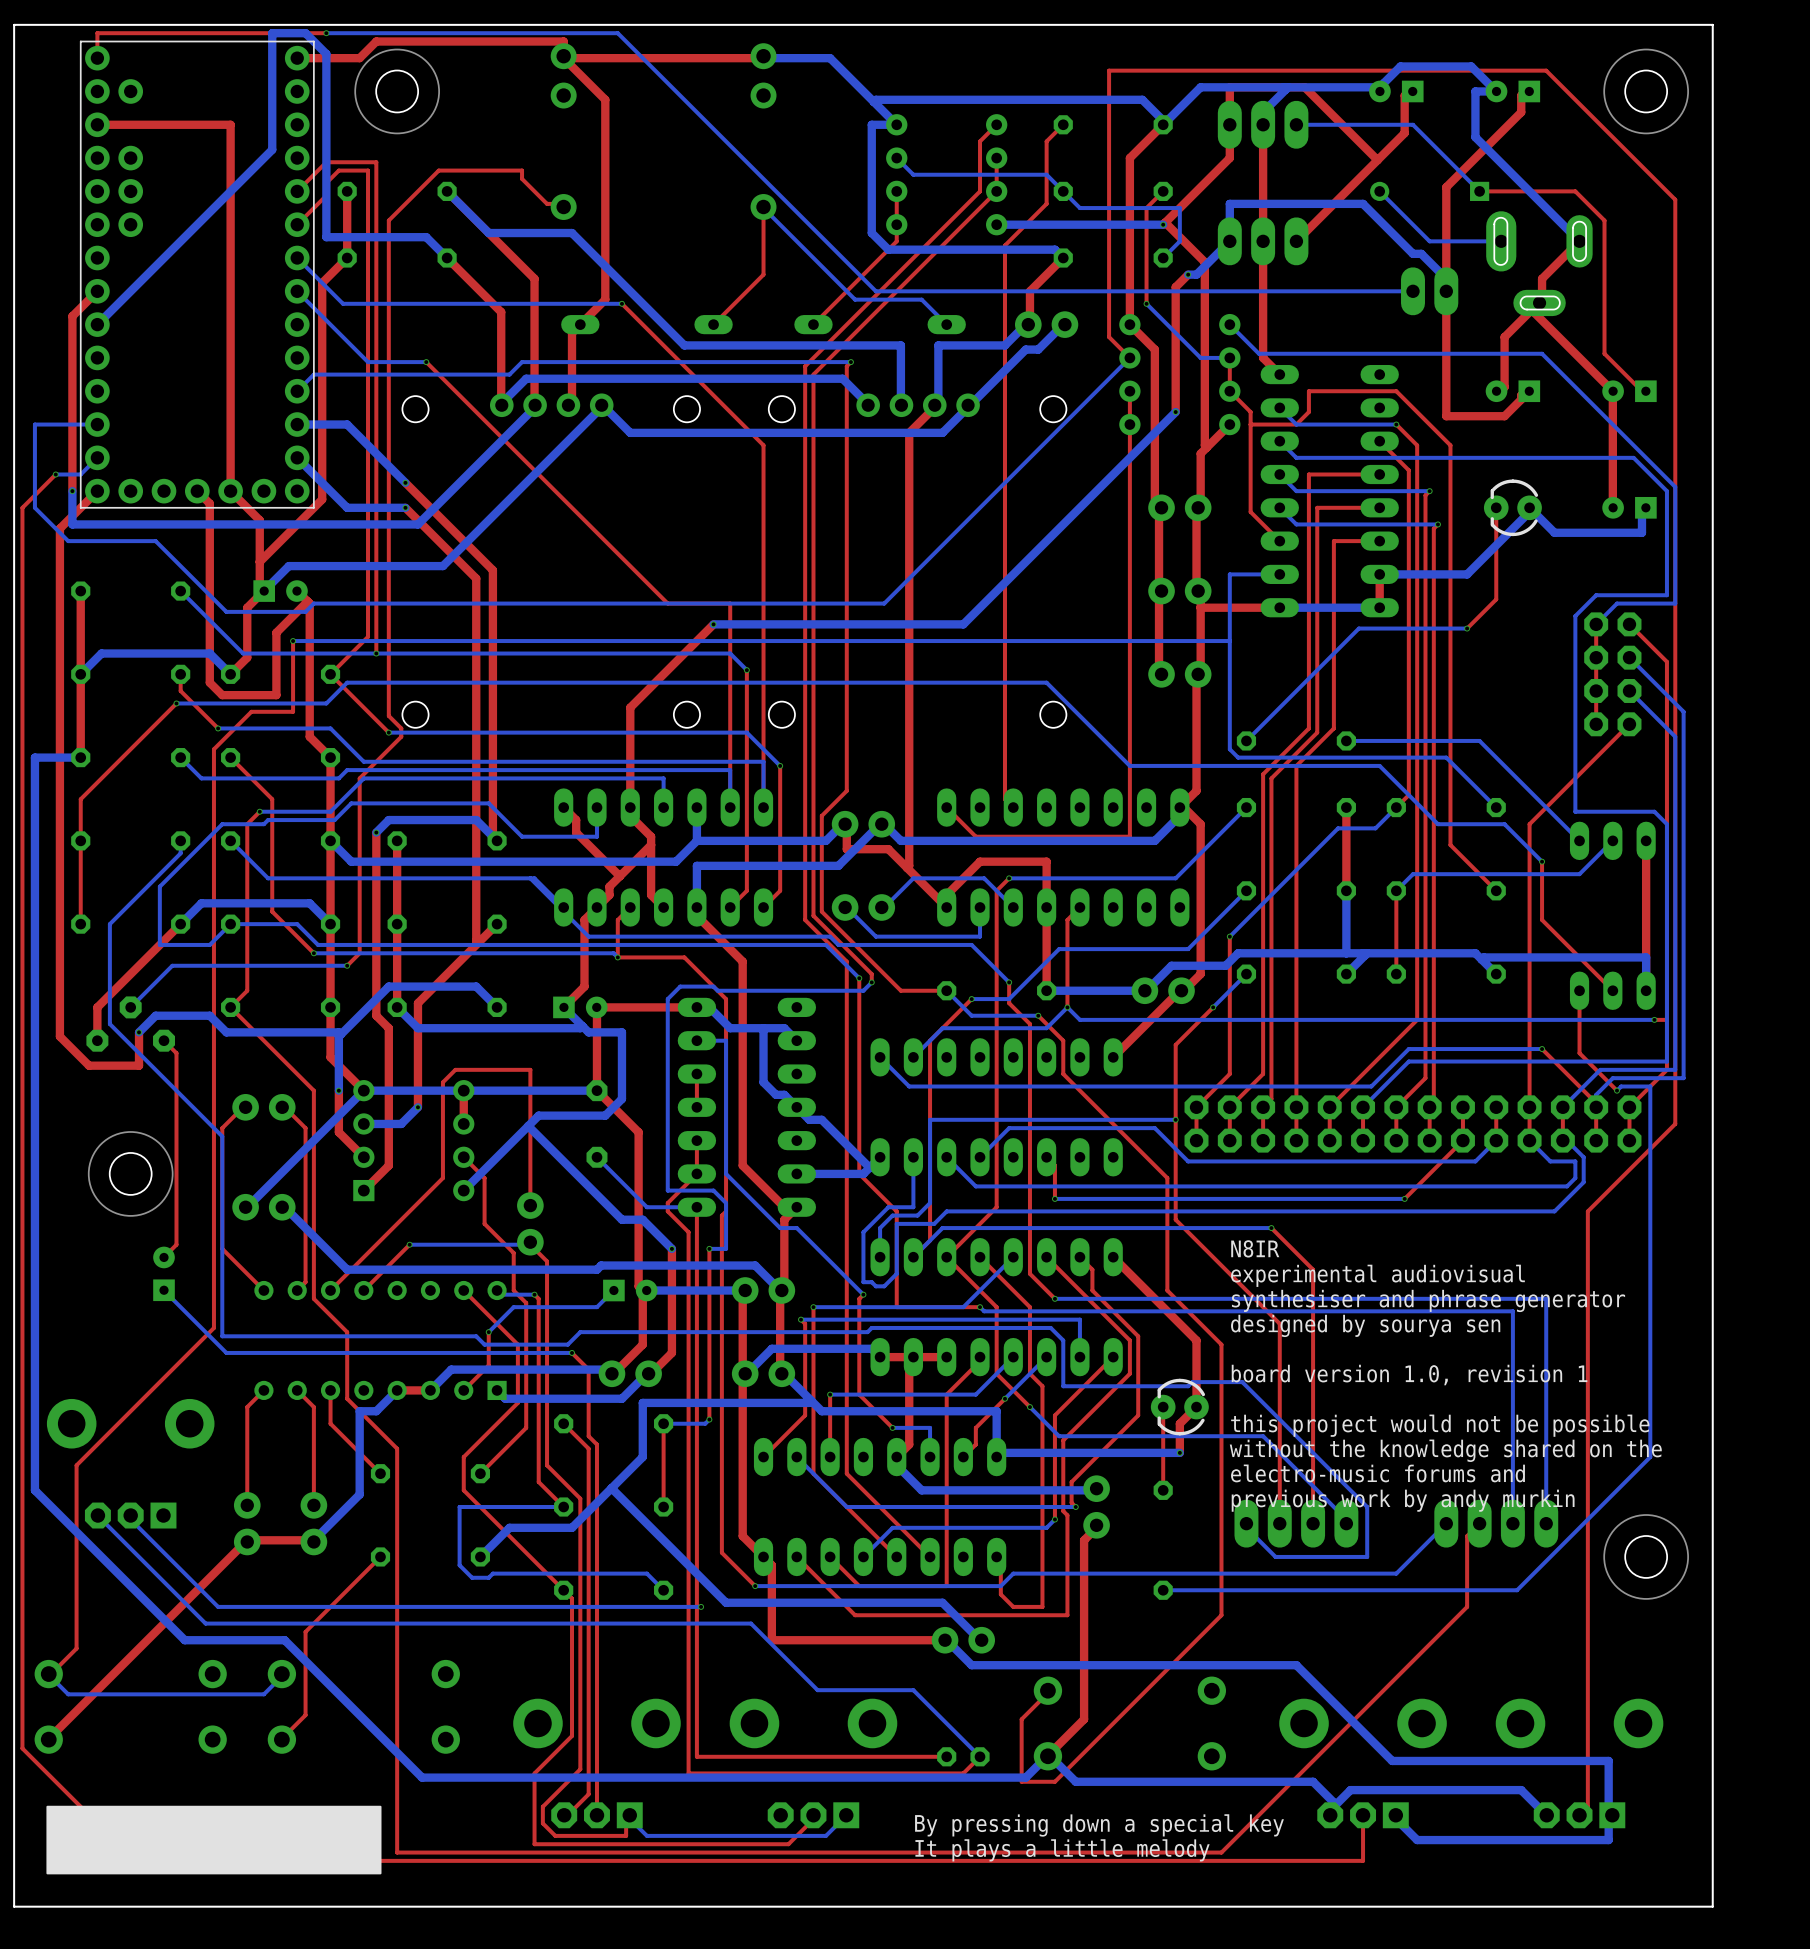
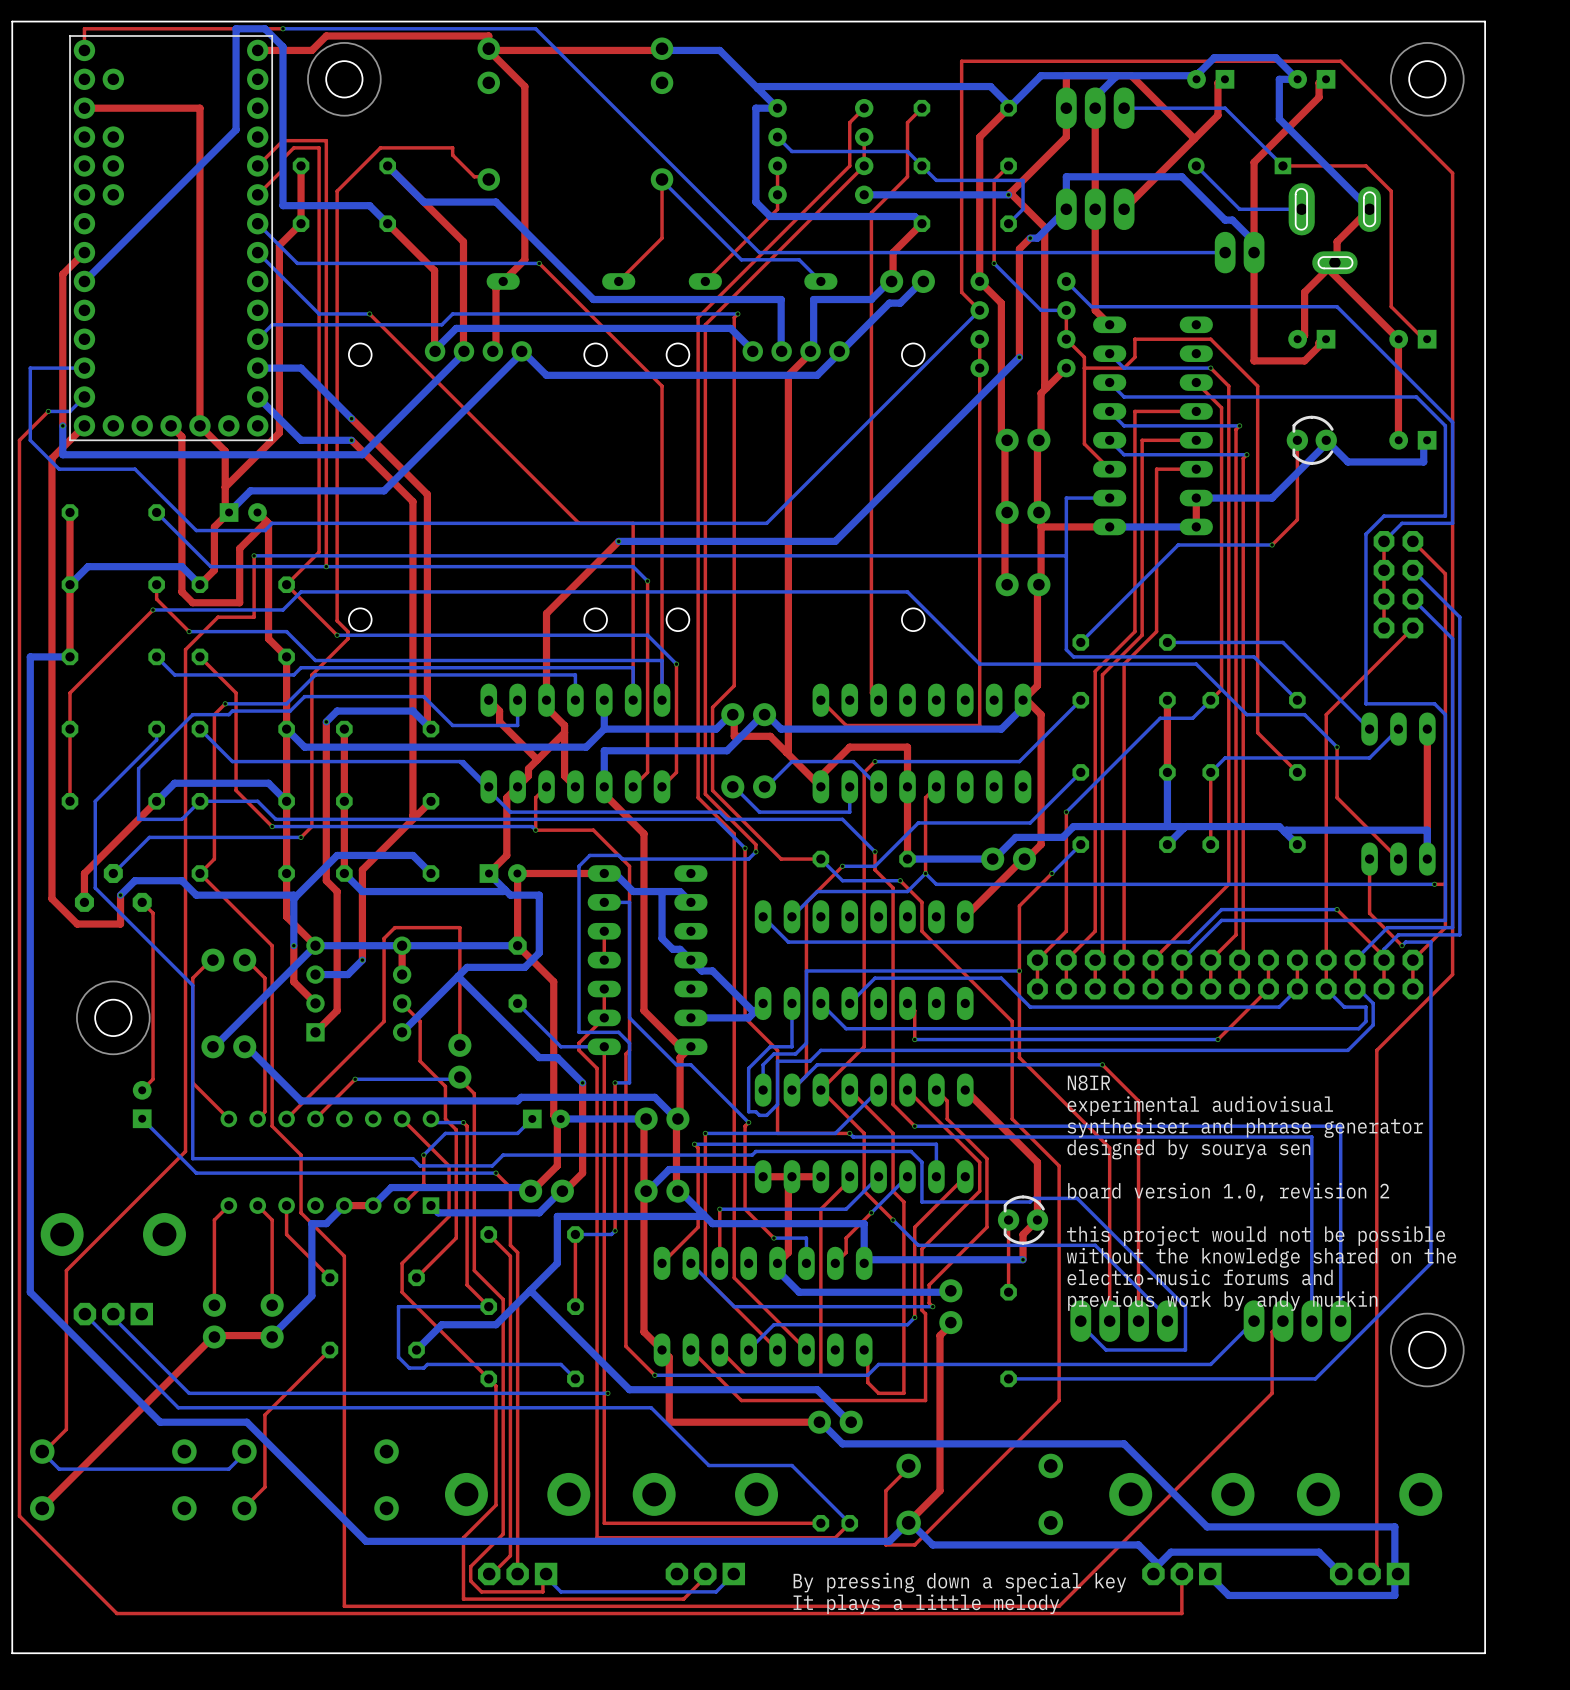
text: board version 1.0, revision 1 (1409, 1375) -> board version 1.0, revision 2 (1228, 1192)
drawing: [46, 1805, 382, 1875] -> none

